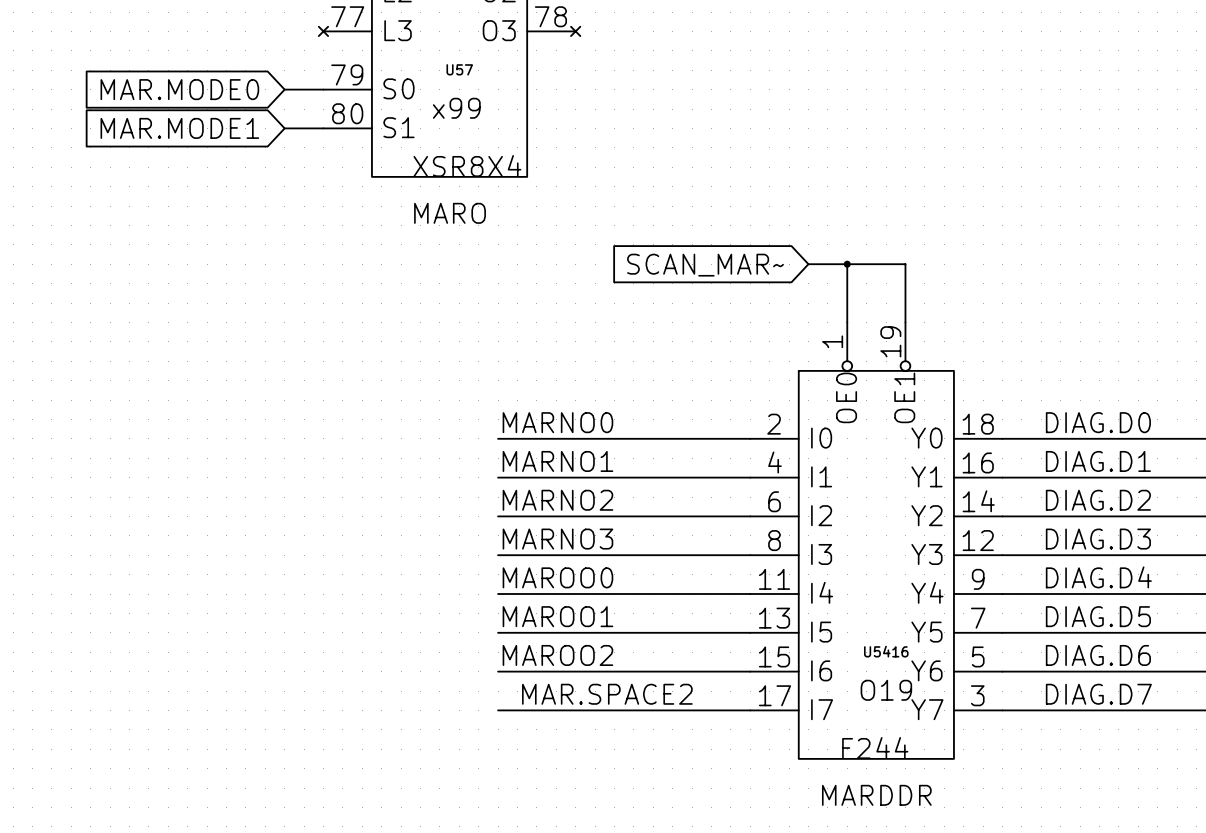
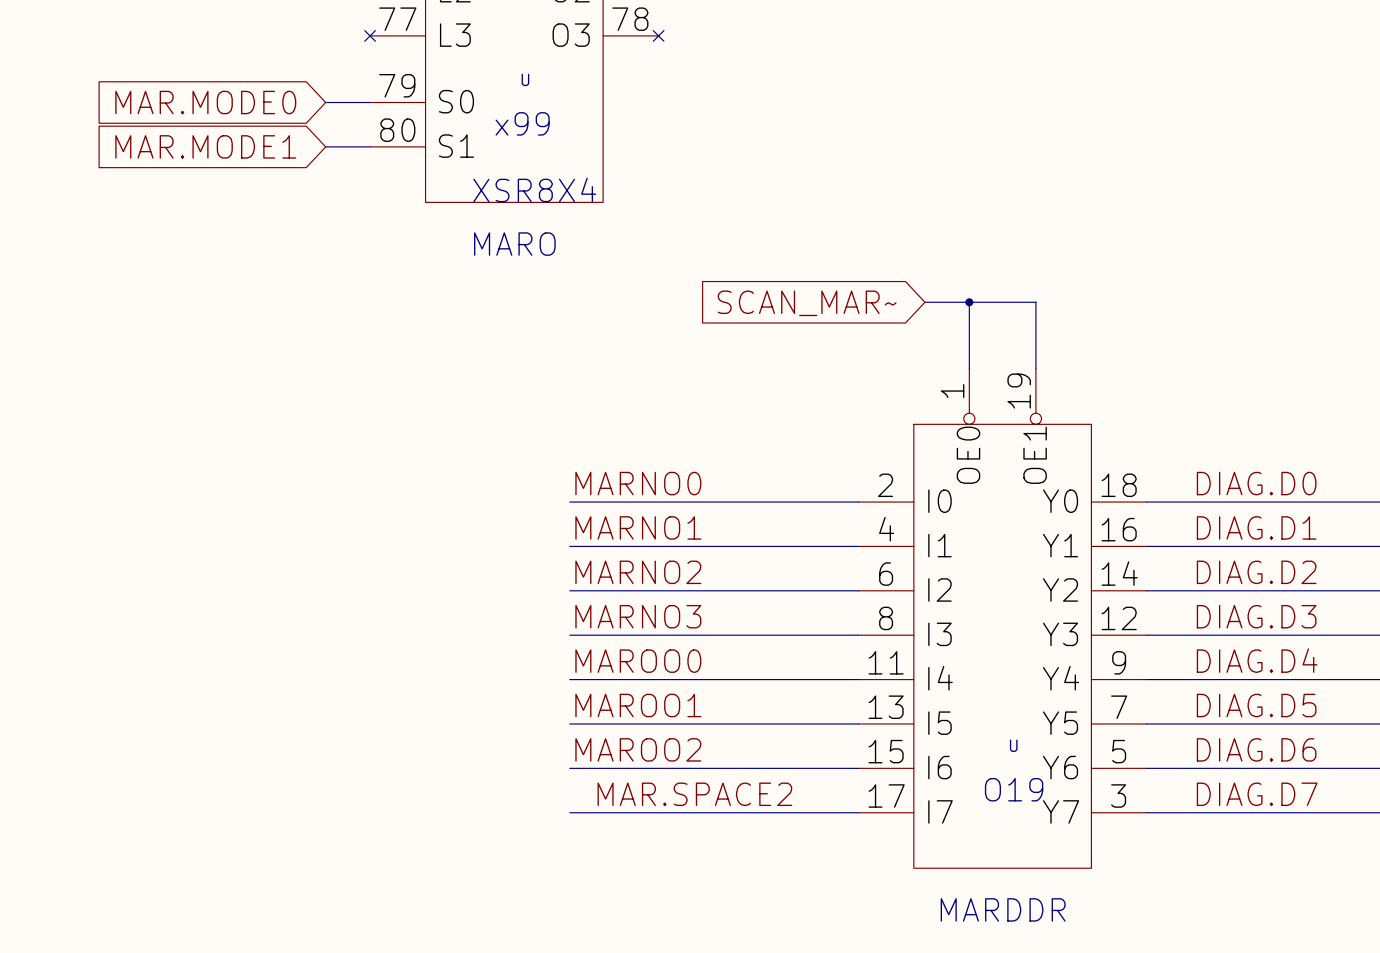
U57 name: U57 (459, 69) -> U (525, 79)
U5416 name: U5416 (886, 651) -> U (1013, 745)
U5416 value: F244 (875, 748) -> none

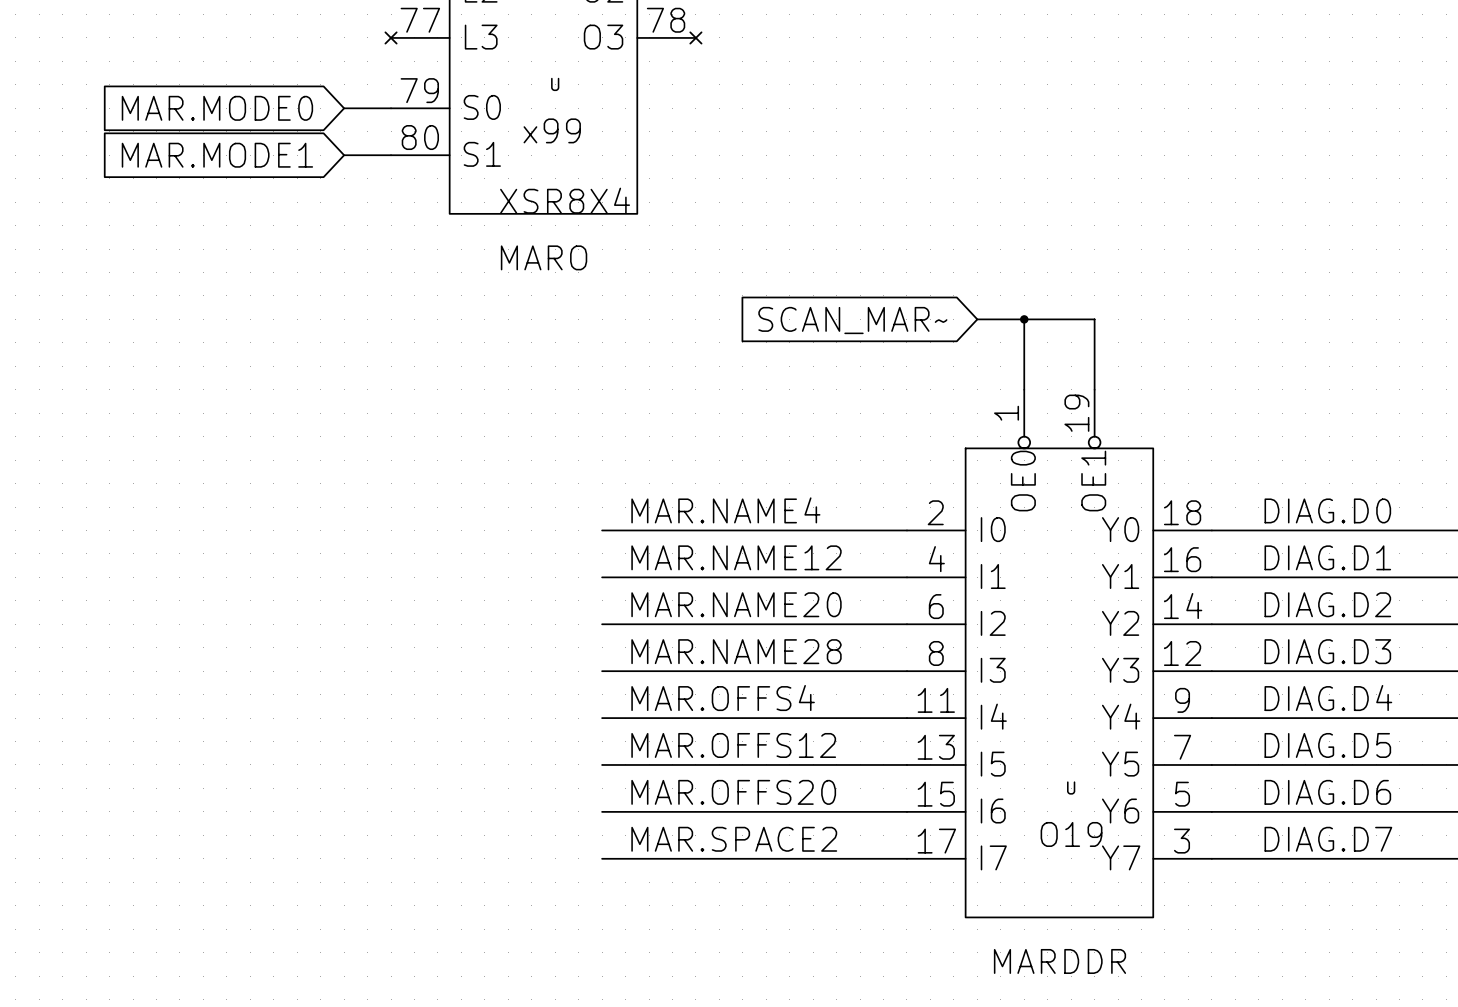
label: MARNO0 (638, 483) -> none
label: none -> MAR.NAME4 (725, 510)
label: MARNO1 (638, 527) -> MAR.NAME12 (736, 557)
label: MARNO2 (638, 572) -> MAR.NAME20 (736, 604)
label: MARNO3 (638, 616) -> none
label: none -> MAR.NAME28 (736, 651)
label: none -> MAR.OFFS4 (723, 698)
label: MAROO0 (638, 661) -> none
label: MAROO1 (638, 705) -> MAR.OFFS12 (733, 745)
label: MAROO2 (638, 749) -> MAR.OFFS20 (733, 792)

